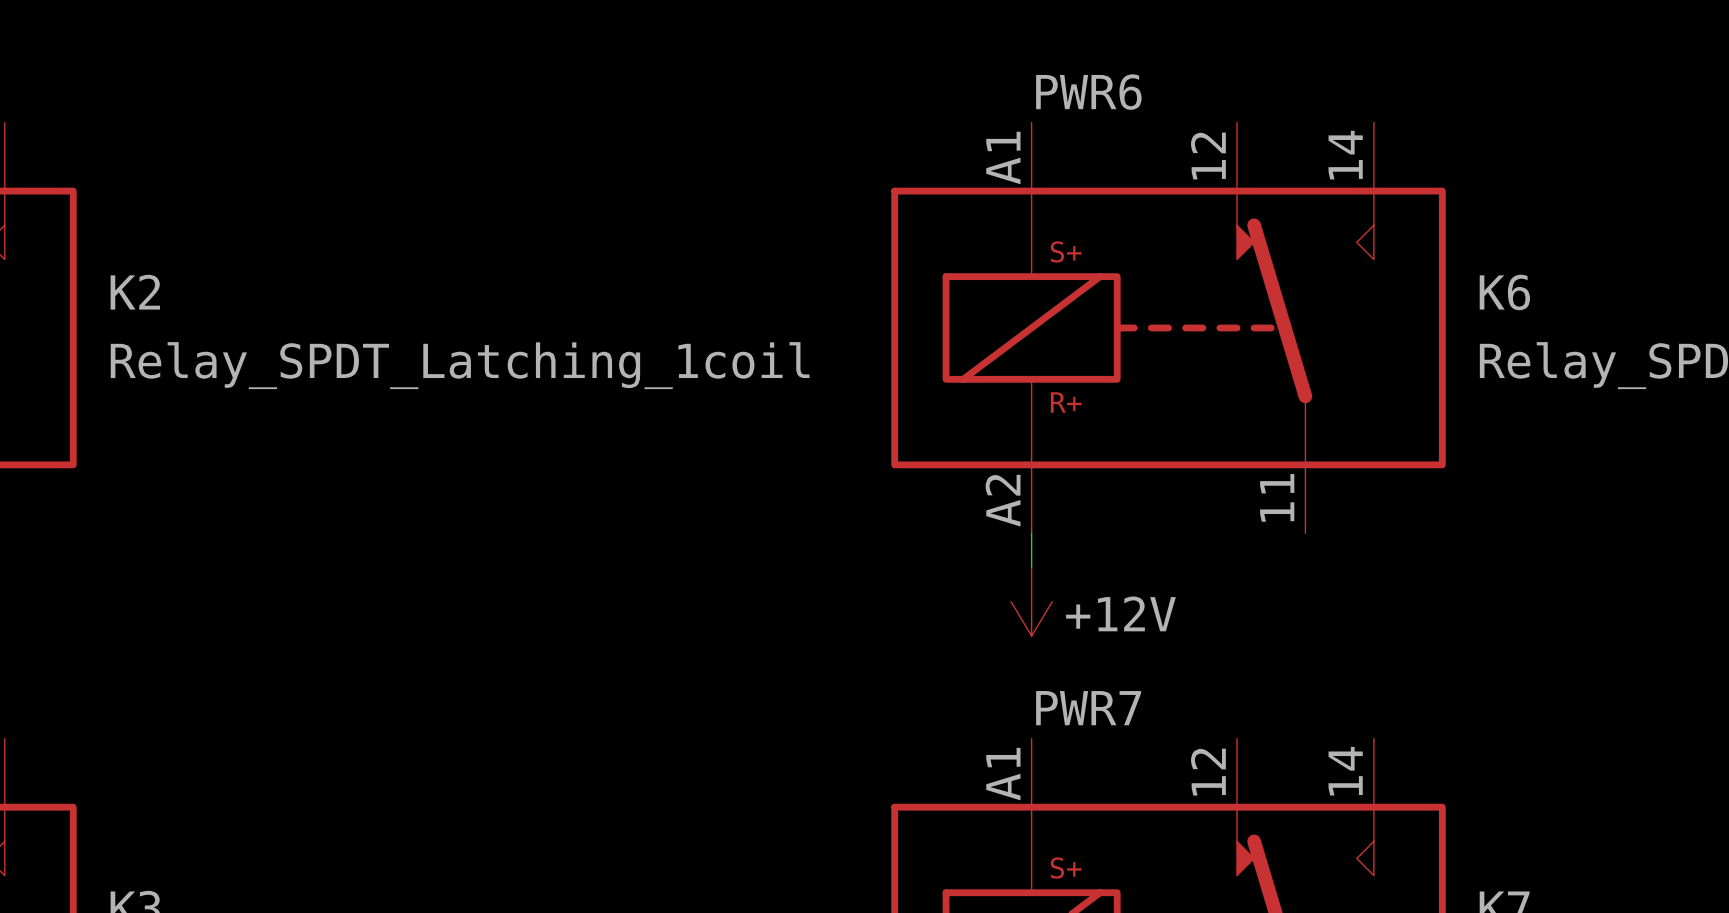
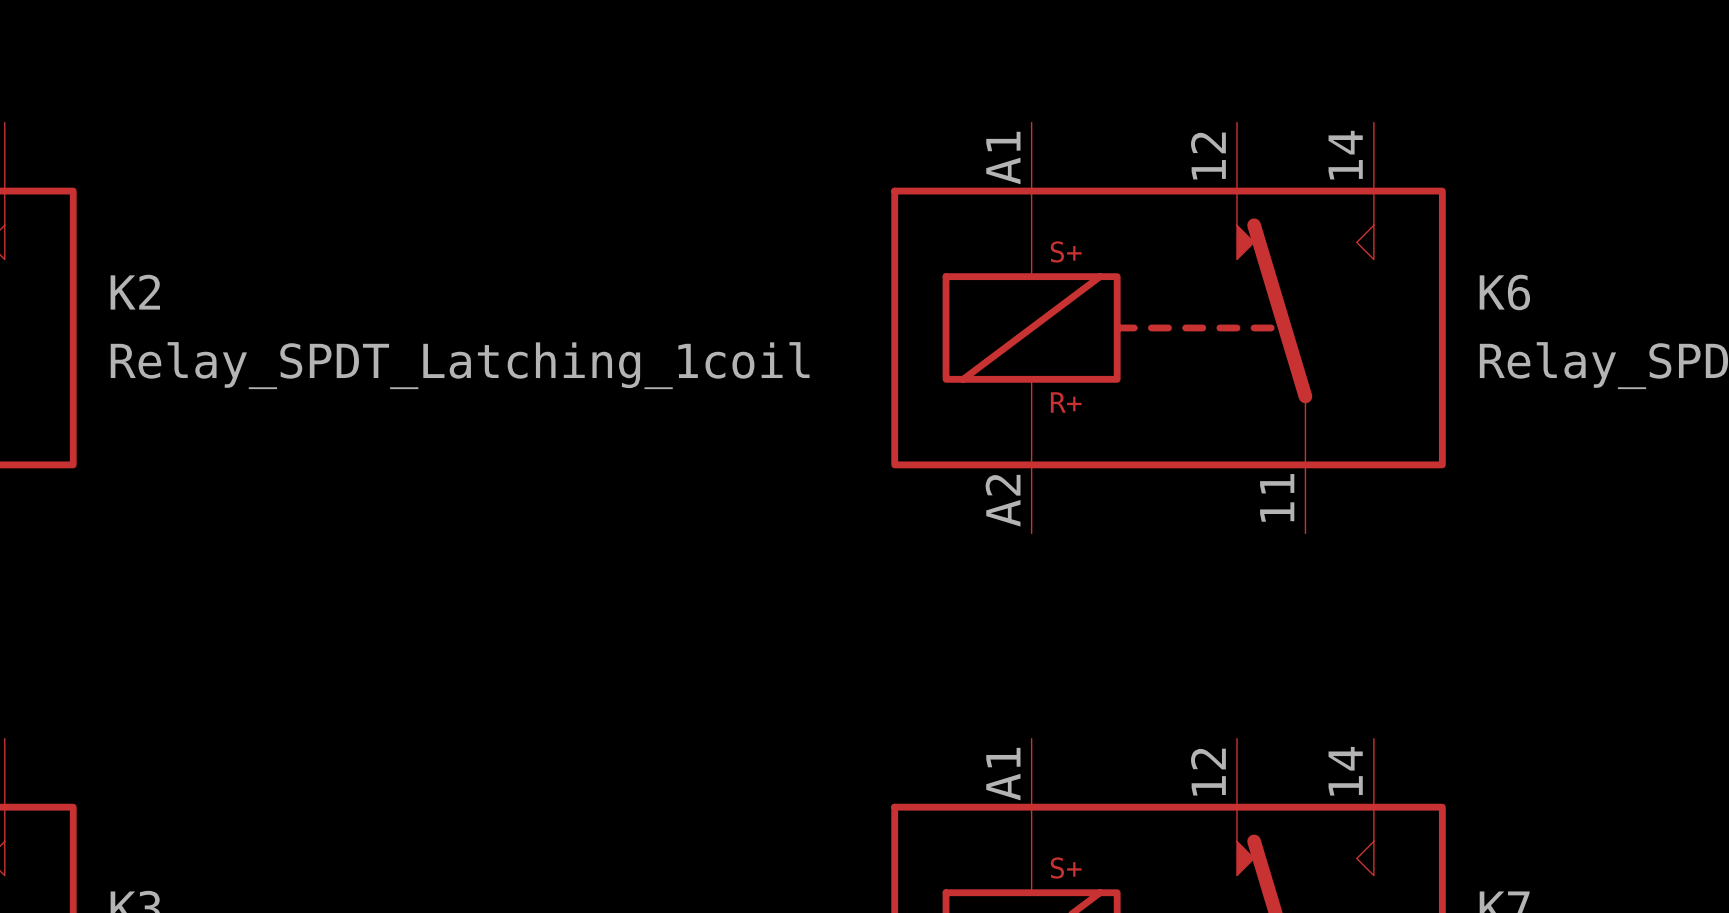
label: PWR6 (1088, 92) -> none
wire: (1031, 533) (1031, 567) -> none
power symbol: +12V (1031, 601) -> none
label: PWR7 (1088, 708) -> none

